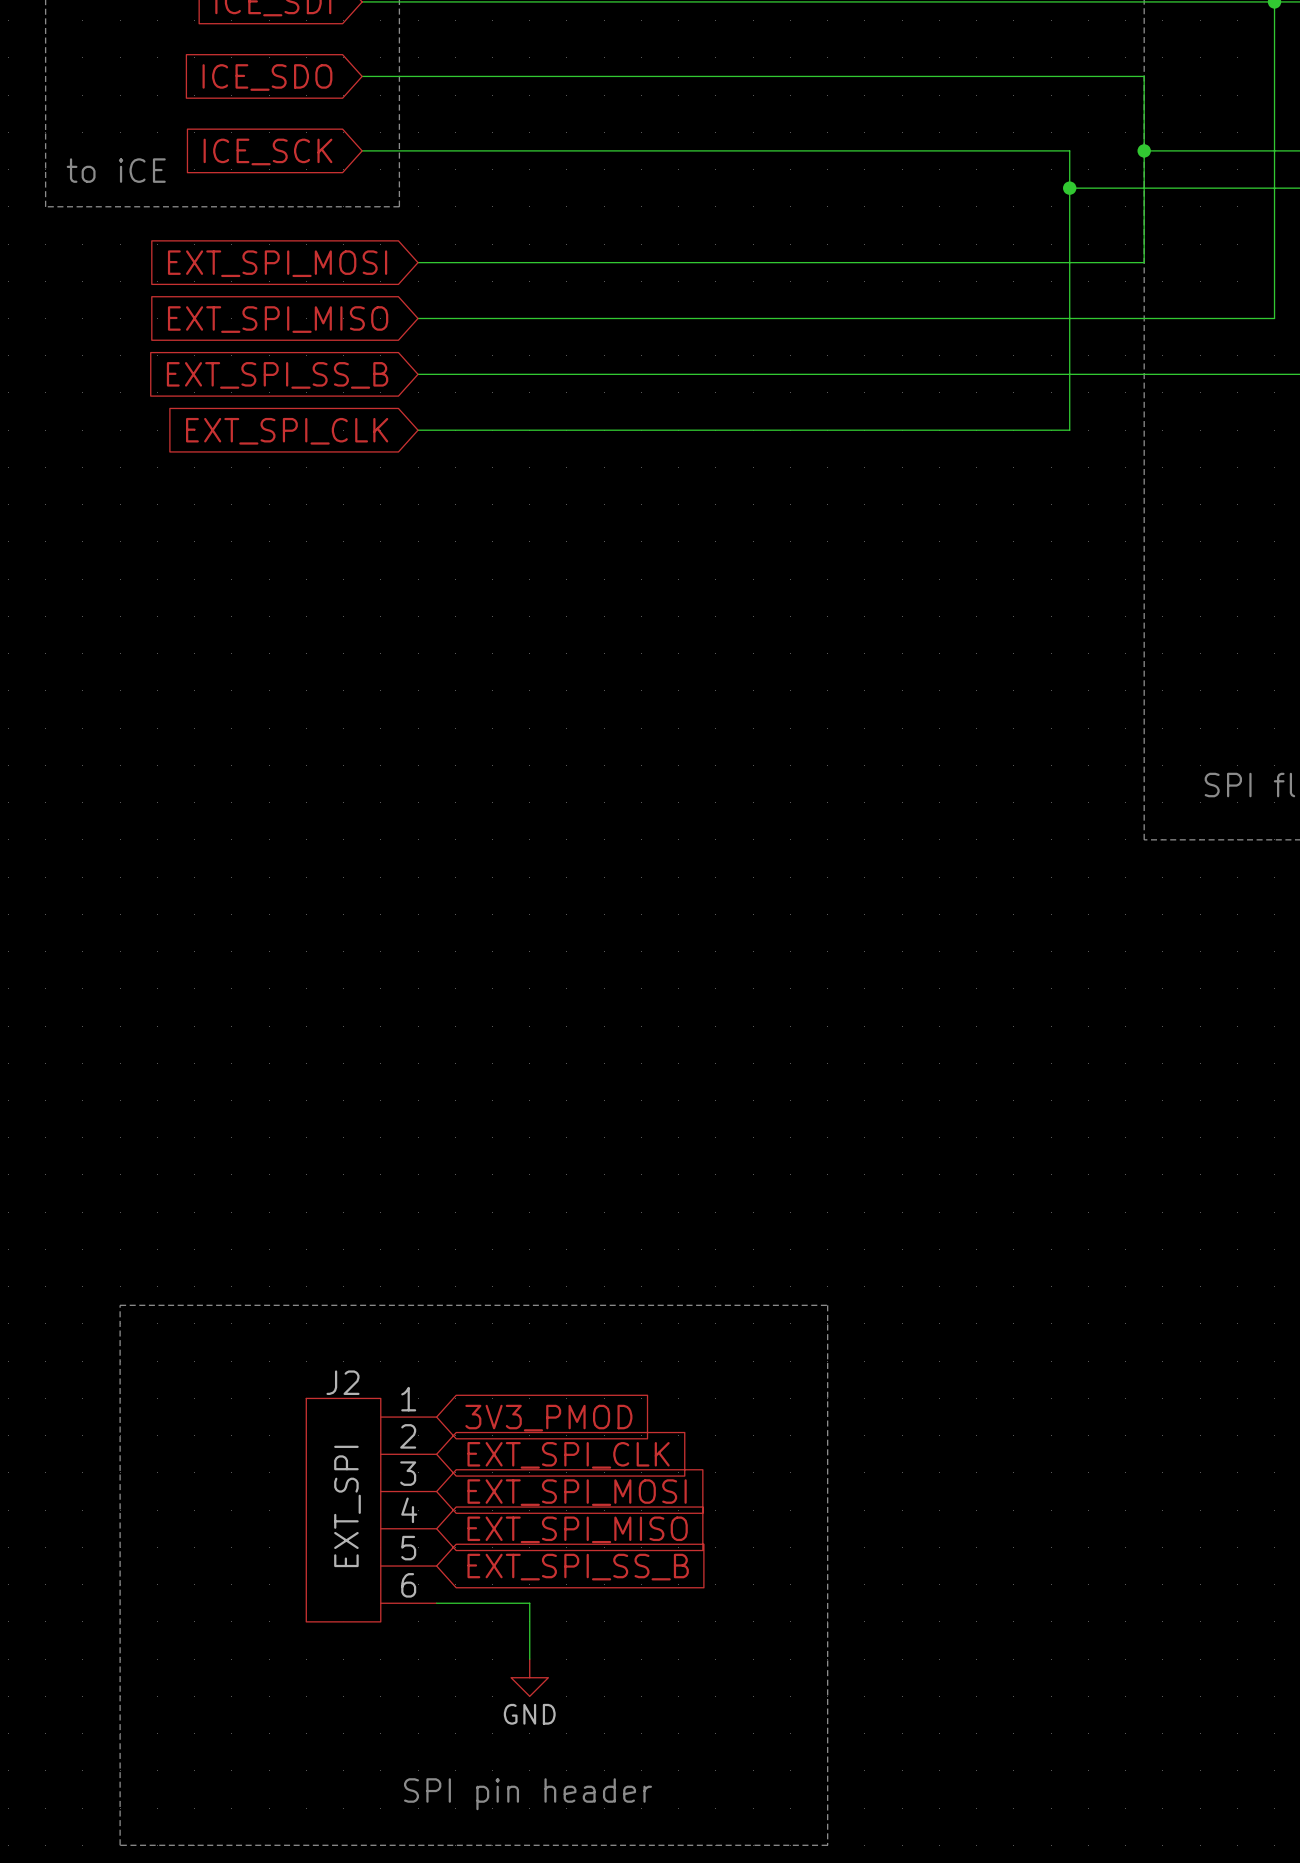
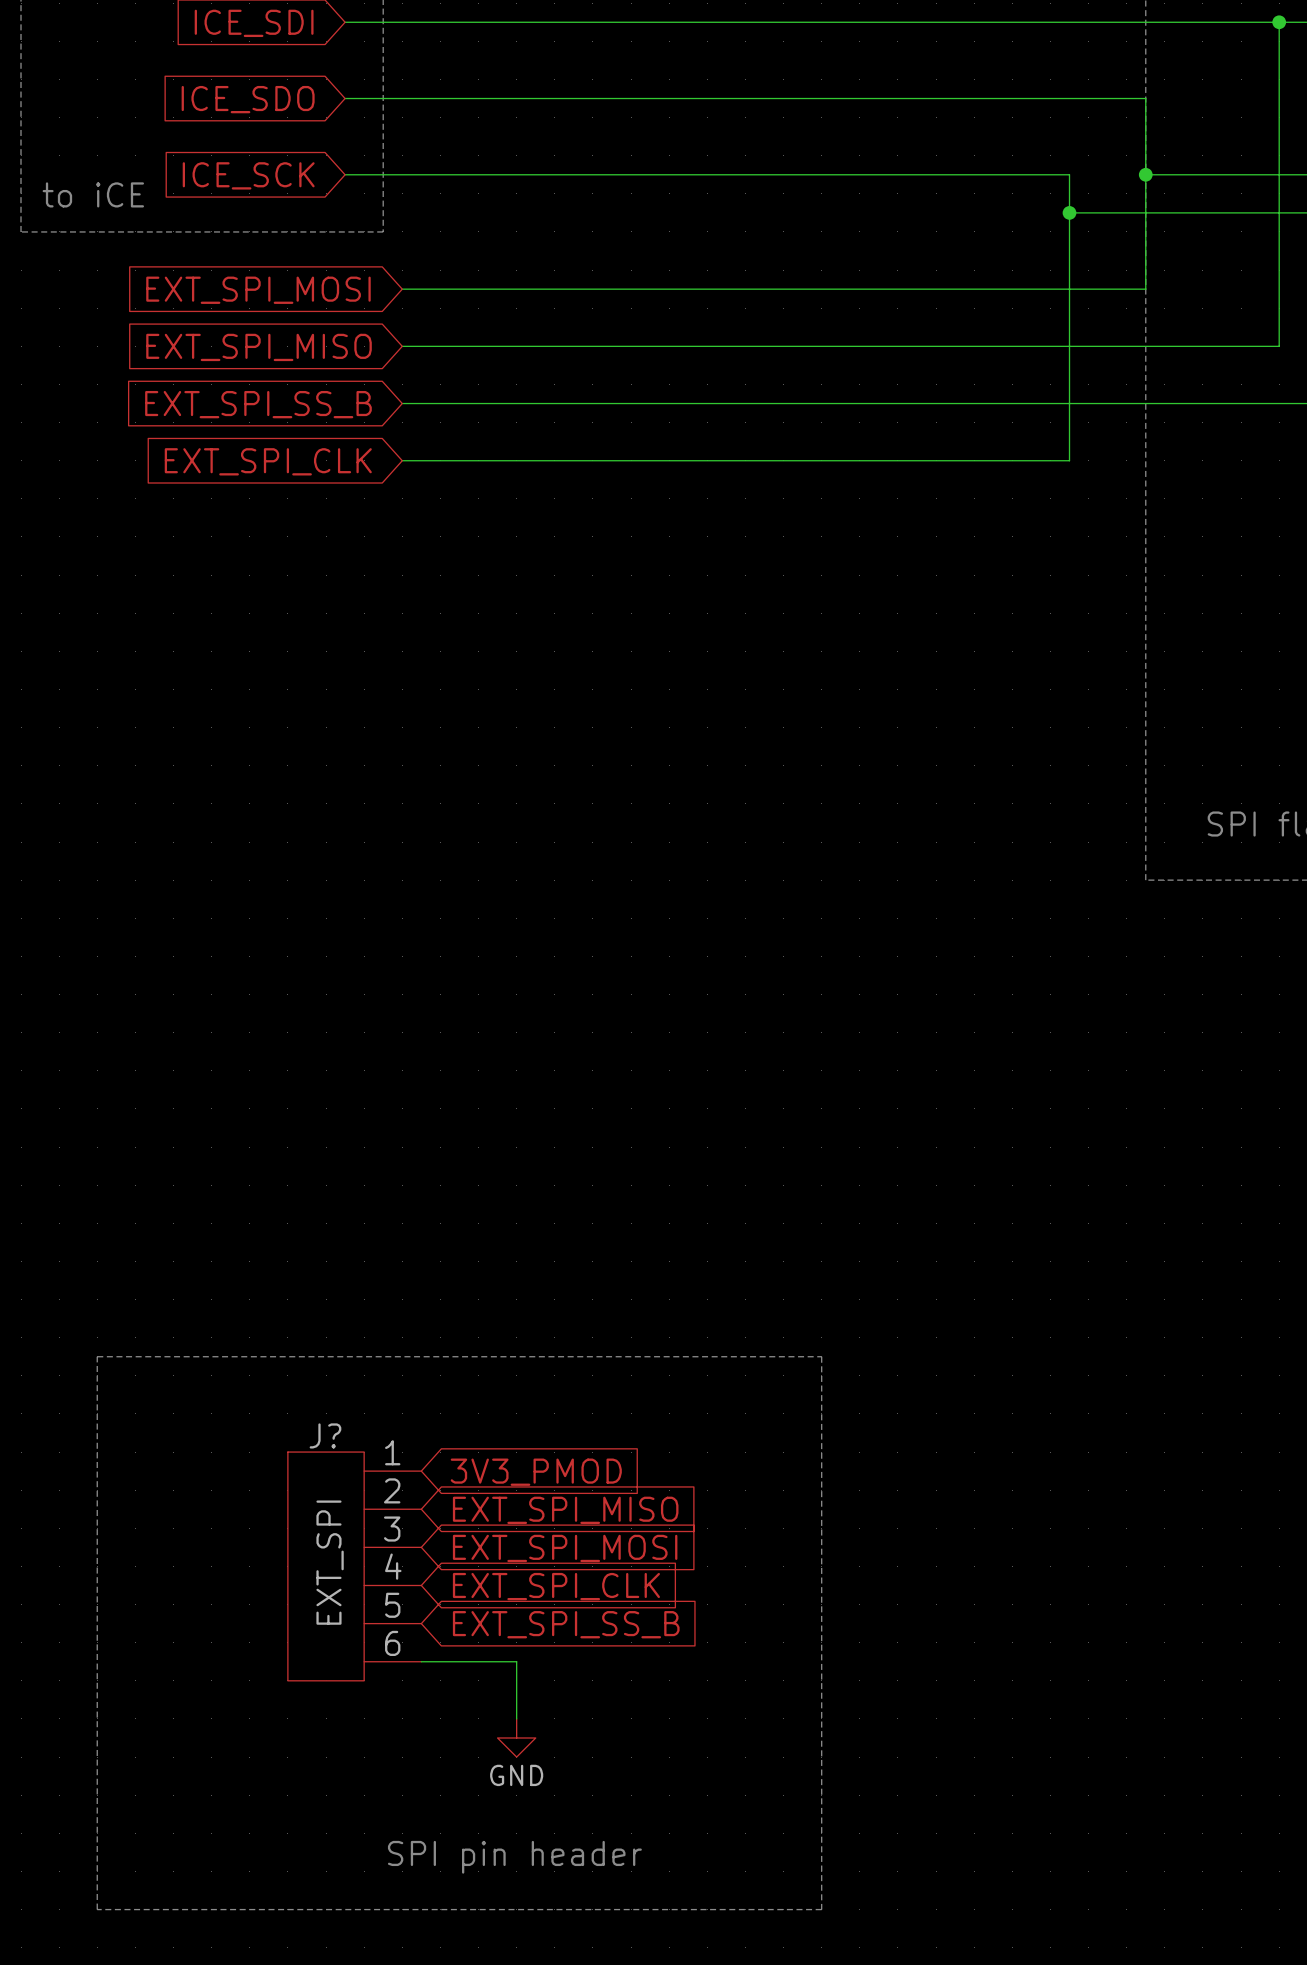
J2 name: J2 (343, 1382) -> J? (325, 1435)
global label: EXT_SPI_CLK (568, 1455) -> EXT_SPI_MISO (565, 1510)
global label: EXT_SPI_MISO (577, 1529) -> EXT_SPI_CLK (556, 1586)

